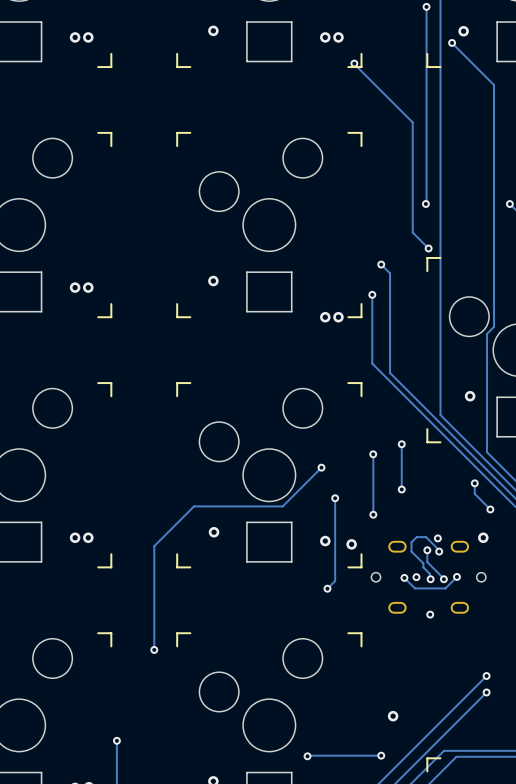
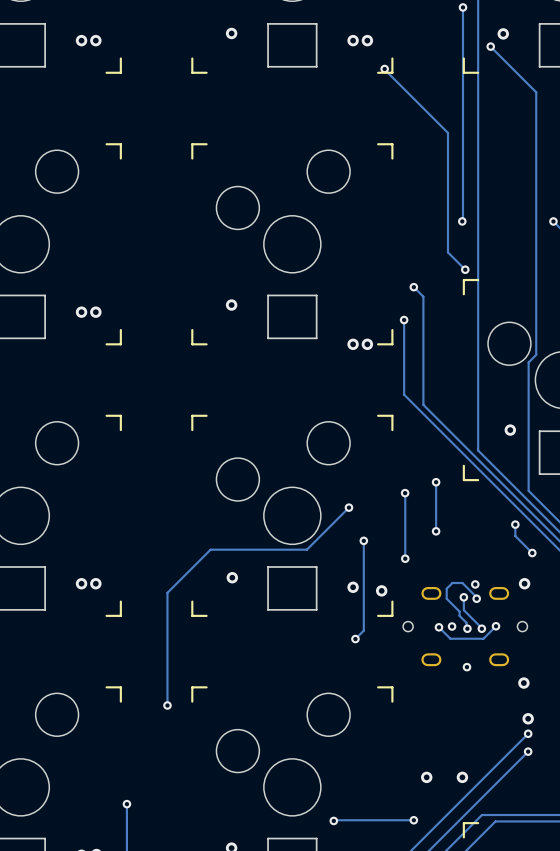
via: none -> (523, 683)
via: none -> (528, 718)
via: none -> (462, 777)

